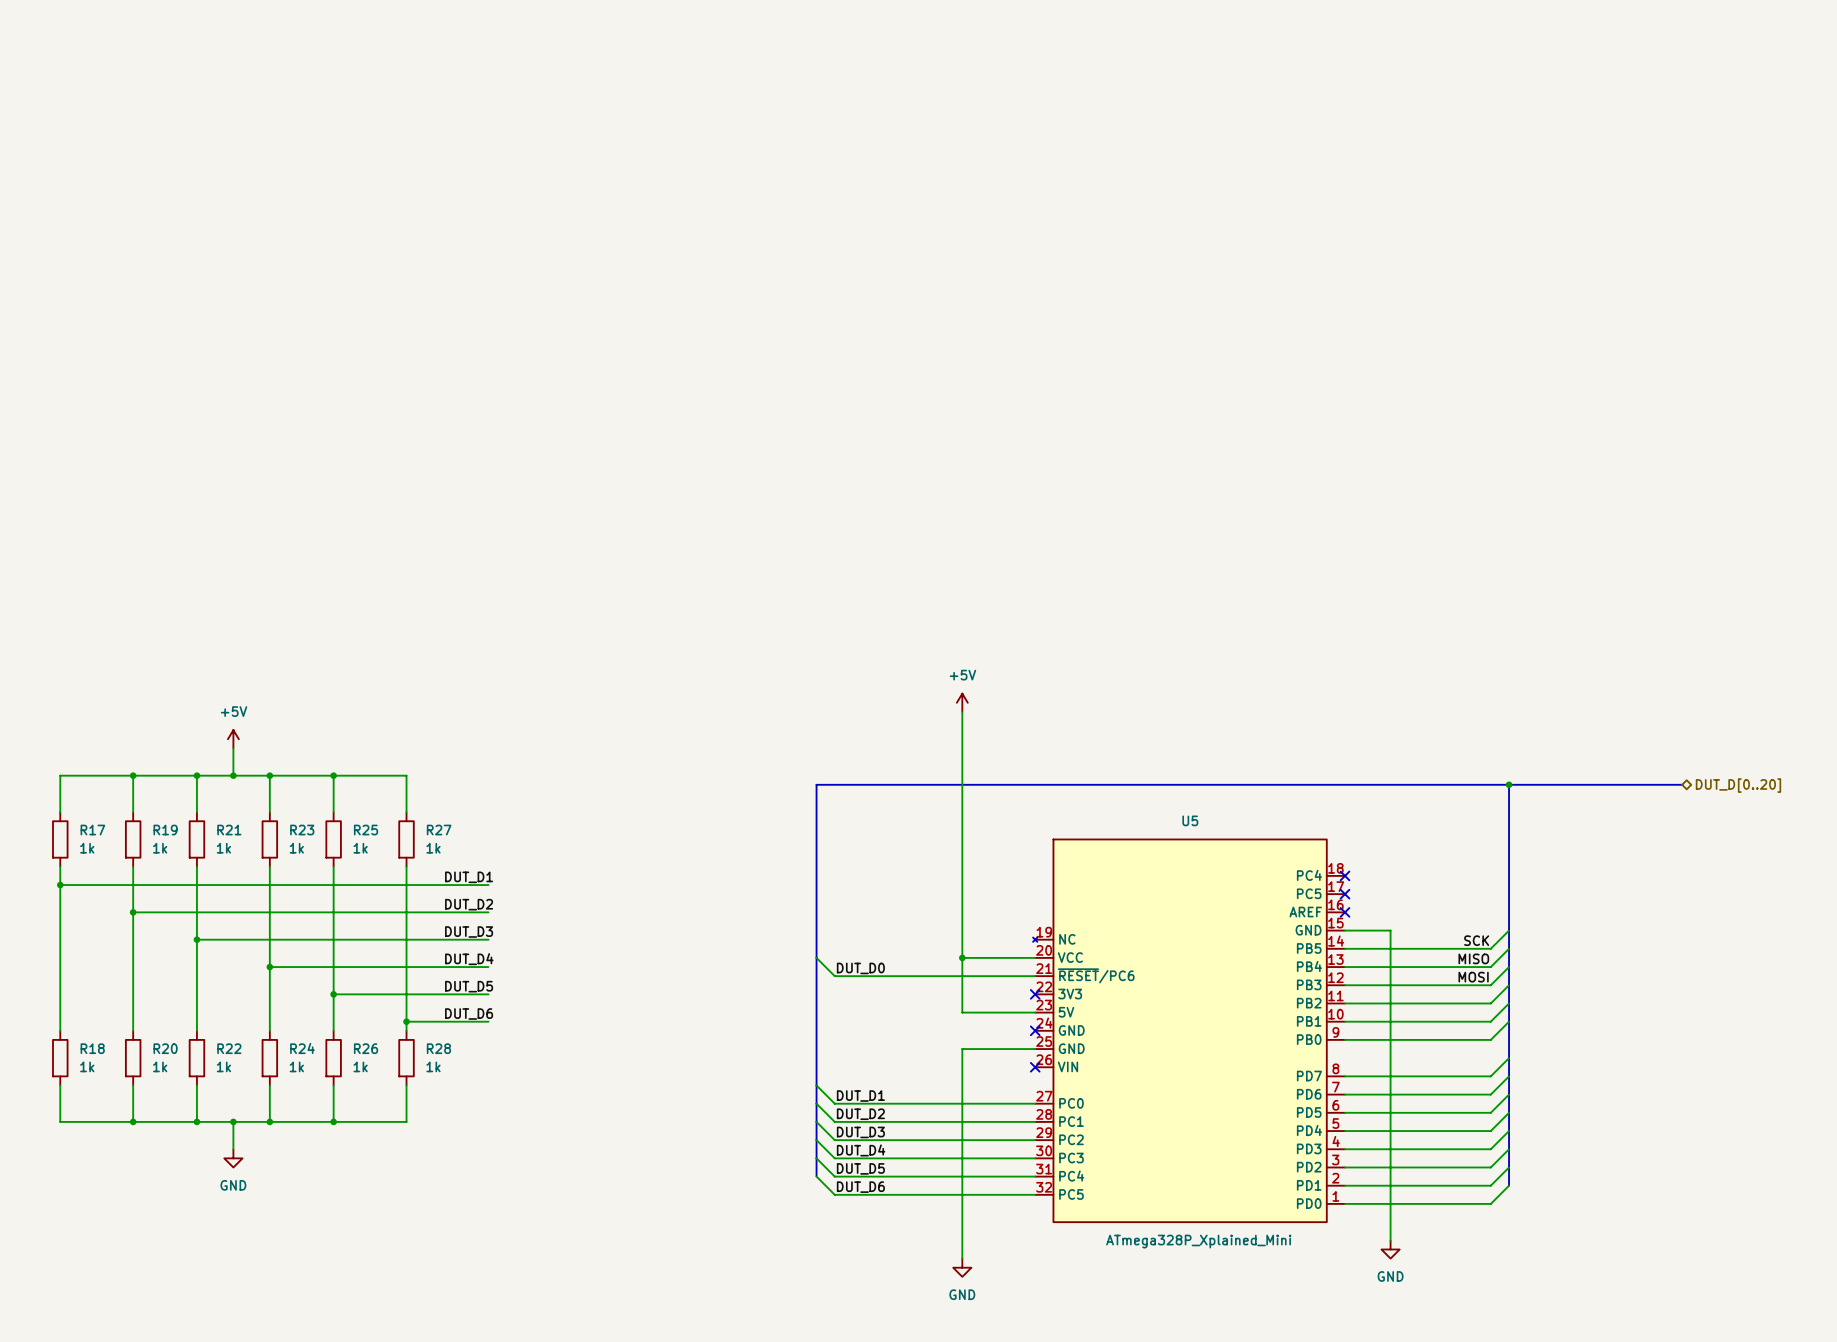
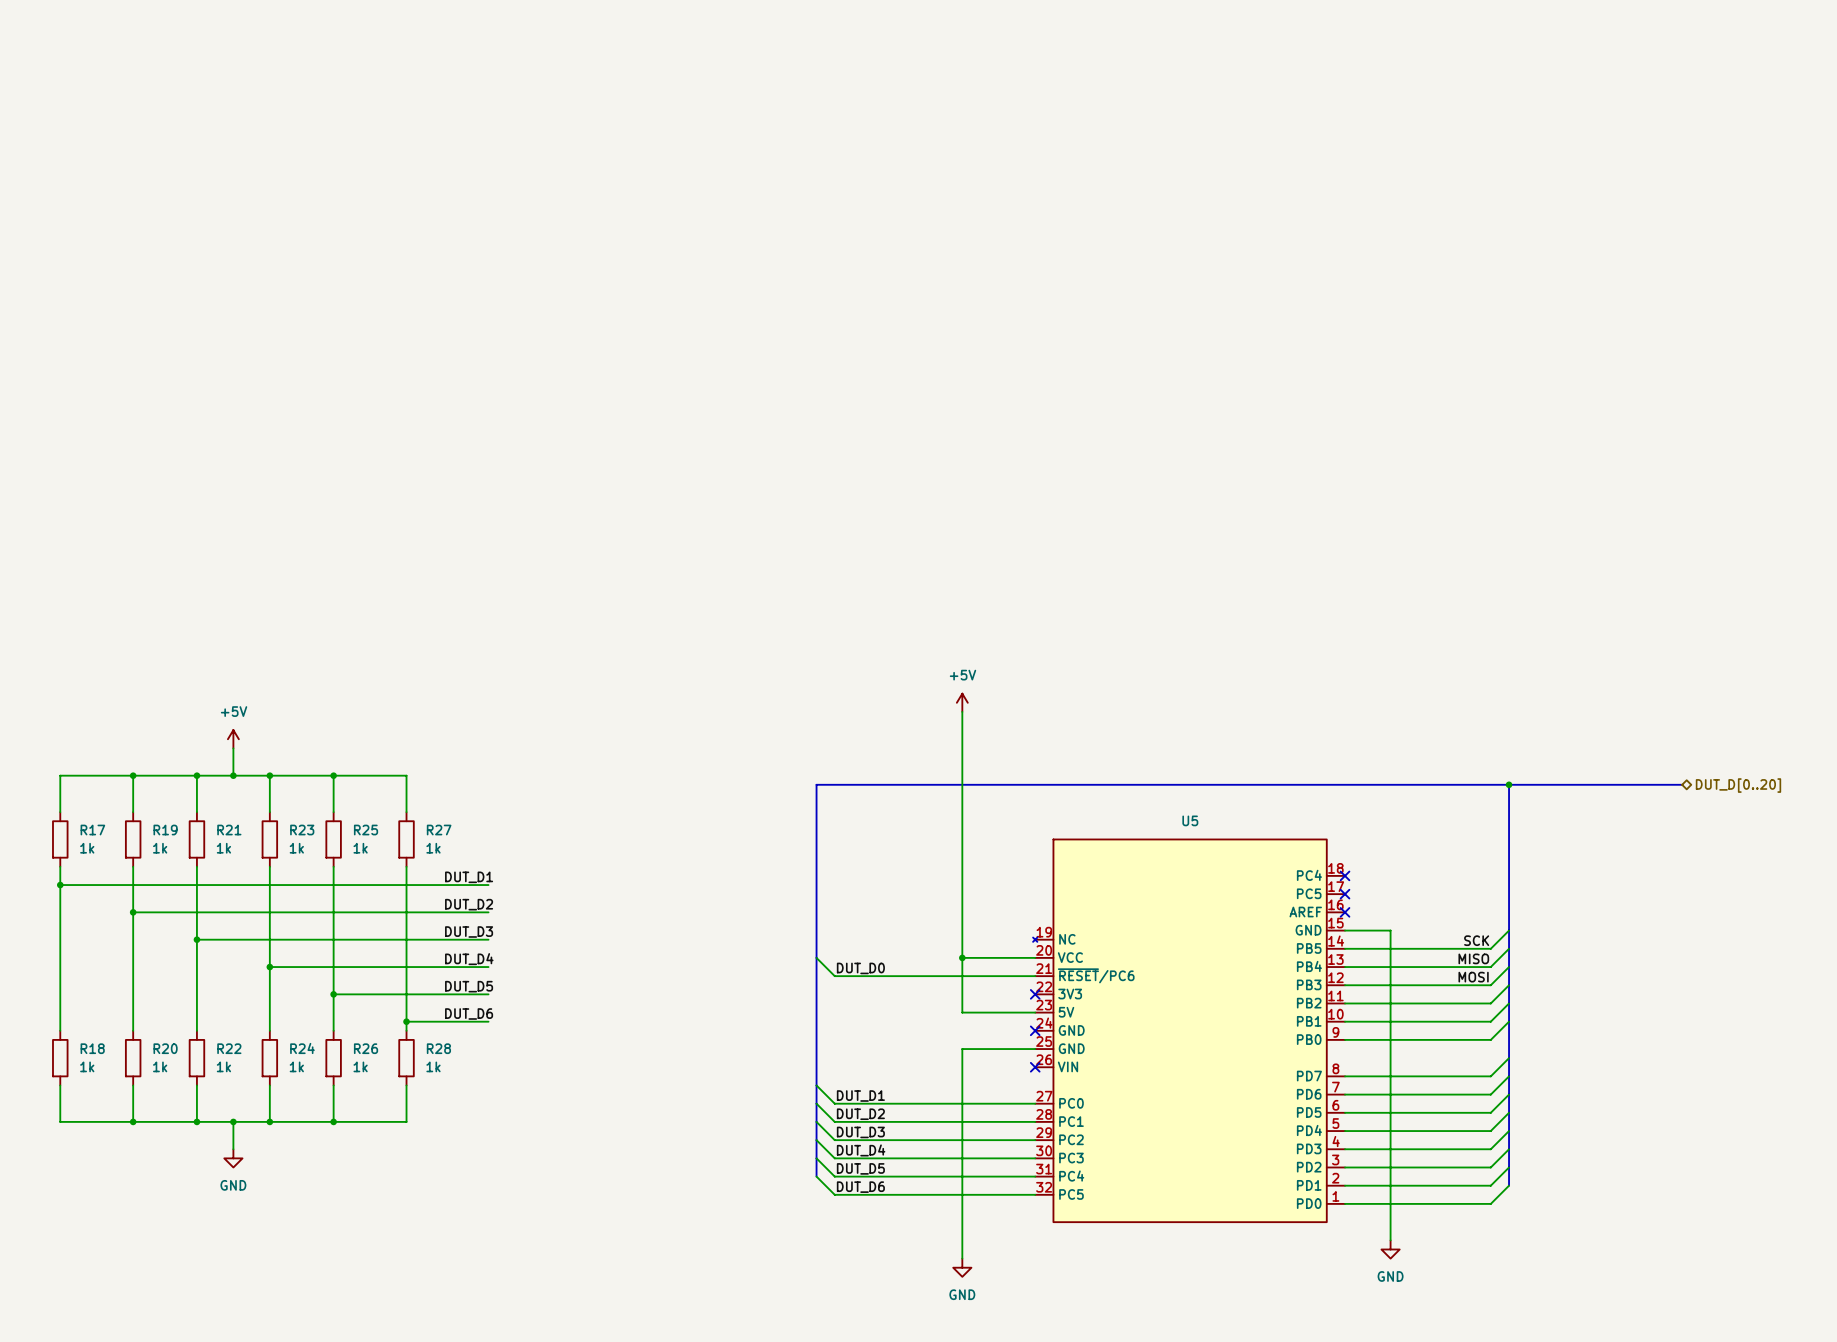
U5 value: ATmega328P_Xplained_Mini (1198, 1241) -> none

